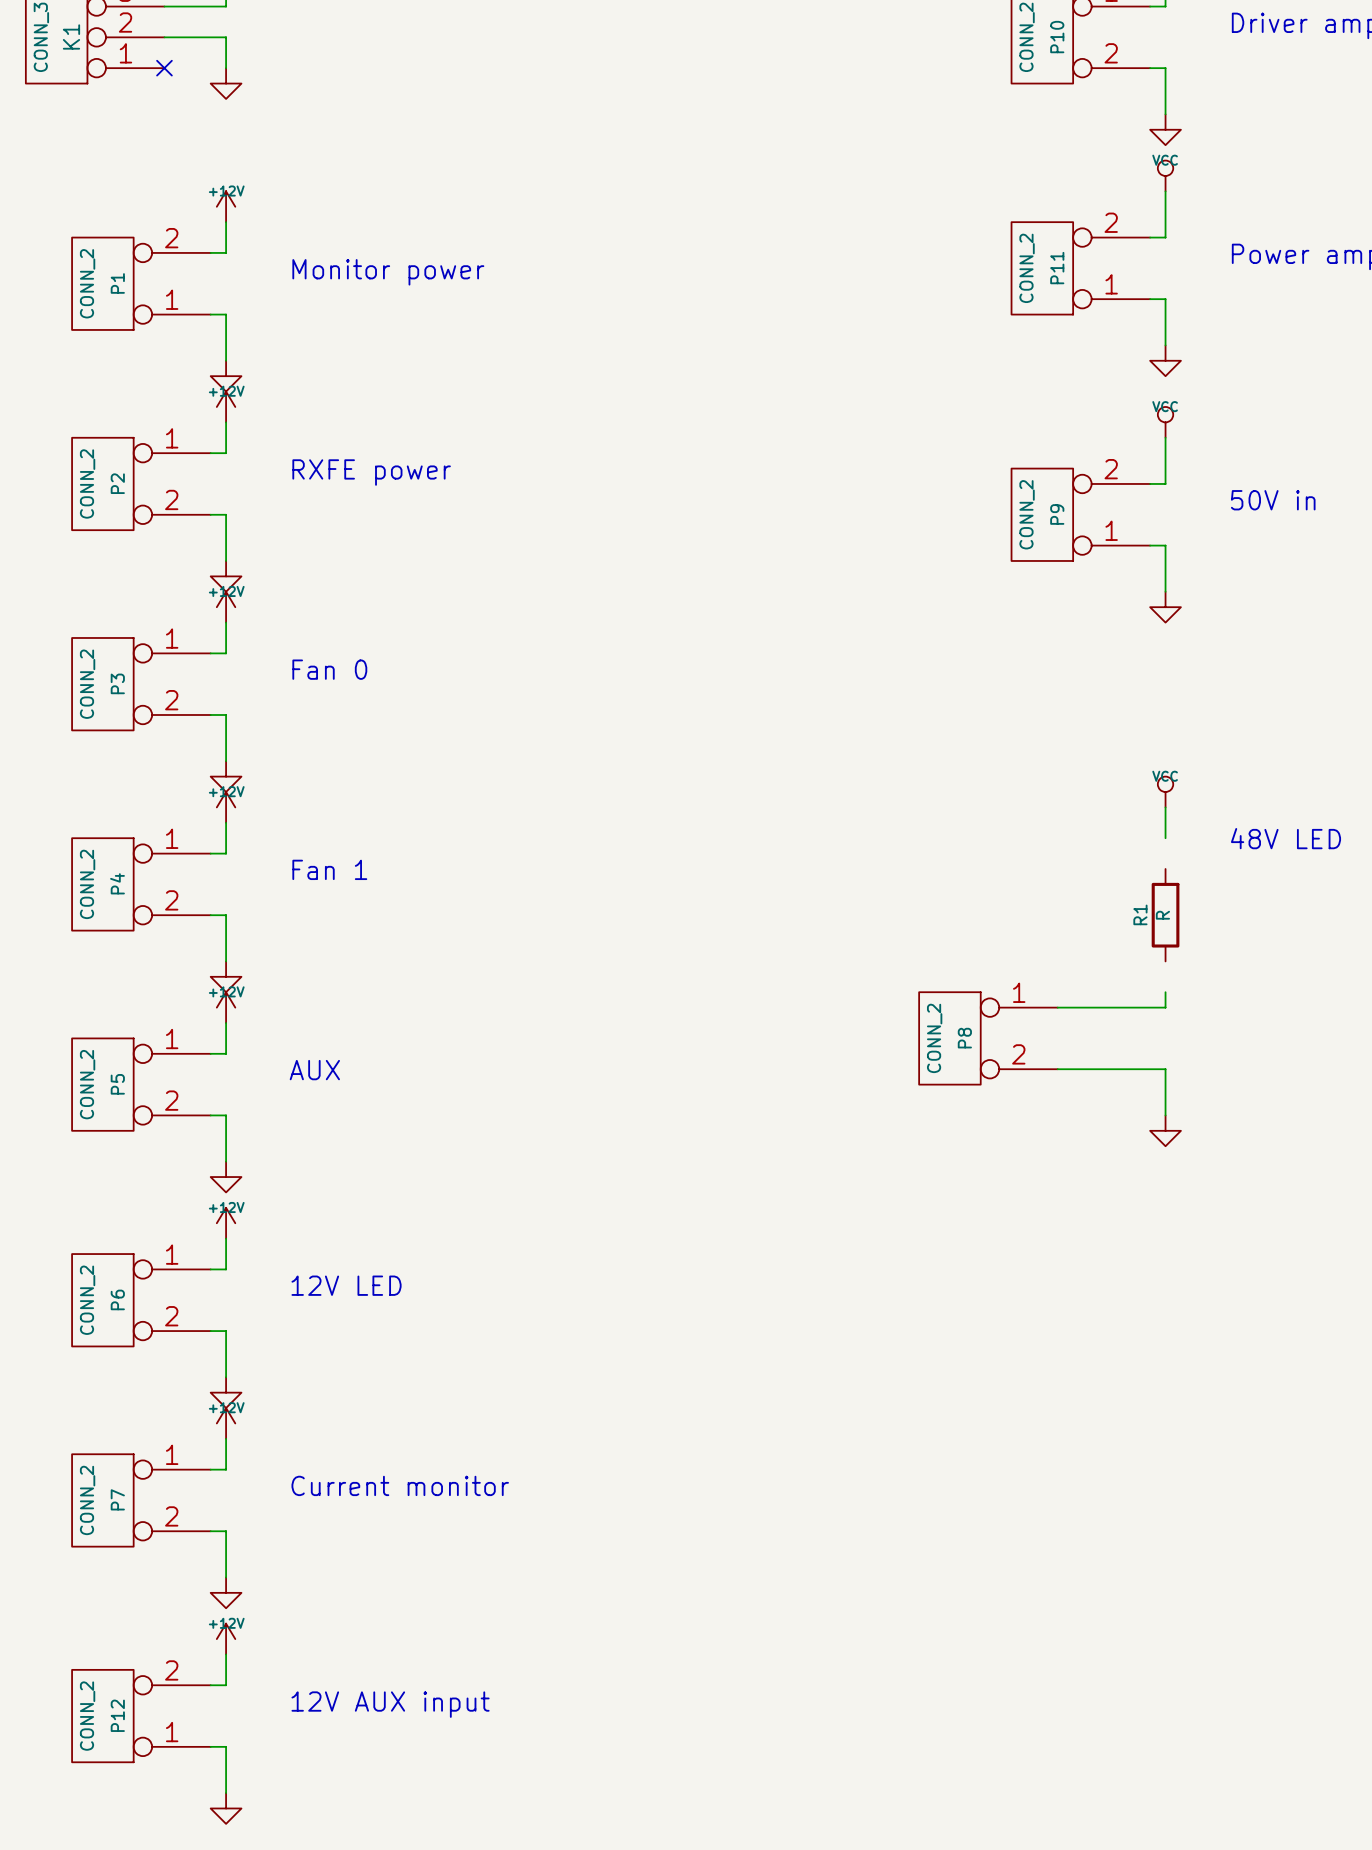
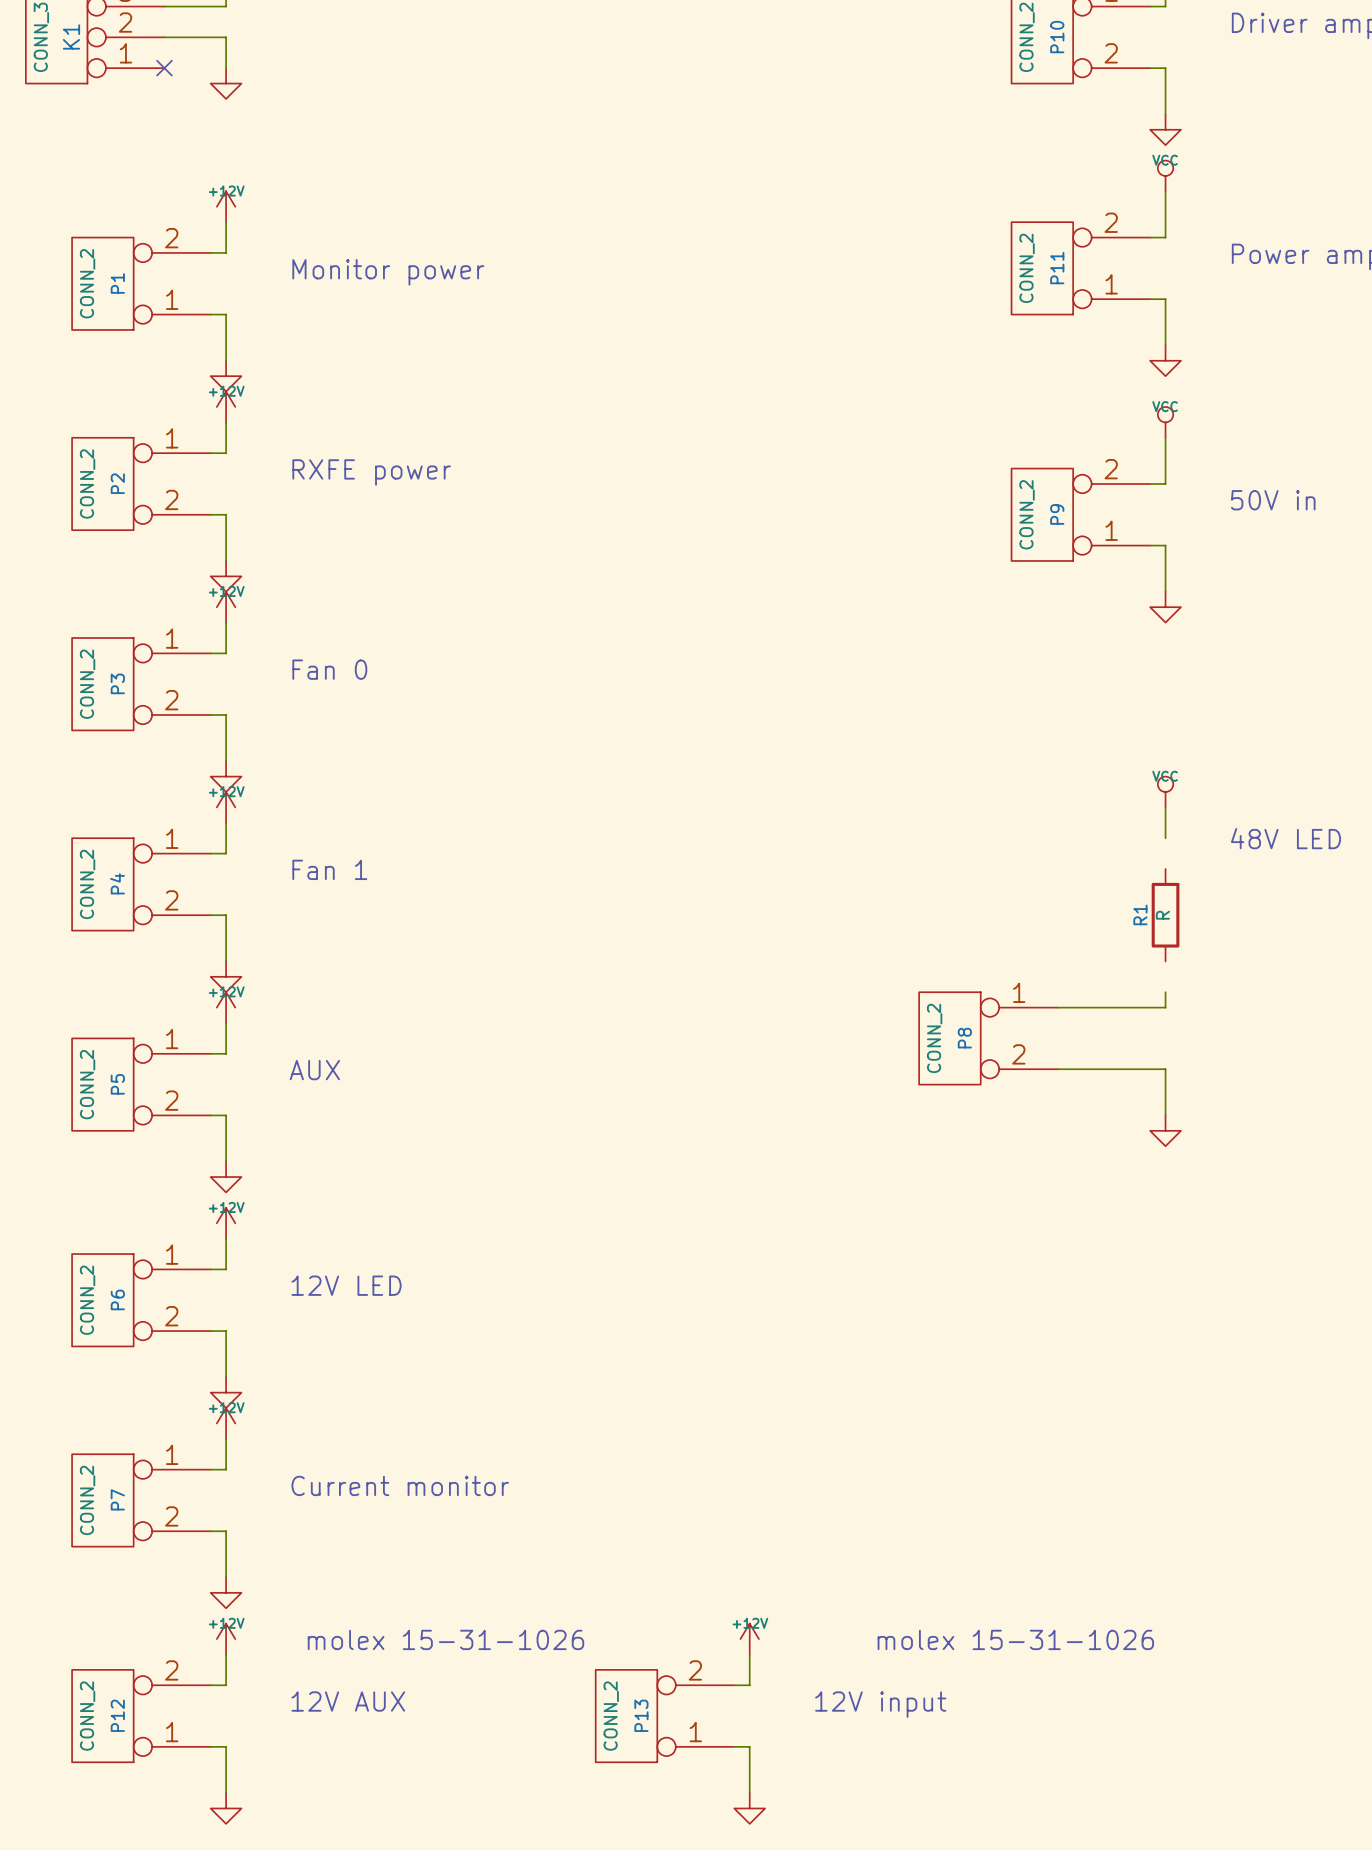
text: none -> molex 15-31-1026 (445, 1639)
power symbol: none -> +12V (749, 1639)
text: none -> molex 15-31-1026 (1015, 1639)
wire: none -> (749, 1654) (749, 1685) (734, 1685)
text: 12V AUX input (390, 1704) -> 12V AUX (348, 1701)
text: none -> 12V input (880, 1704)
P13: none -> CONN_2 (665, 1716)
wire: none -> (734, 1746) (749, 1746) (749, 1793)
power symbol: none -> (749, 1808)

